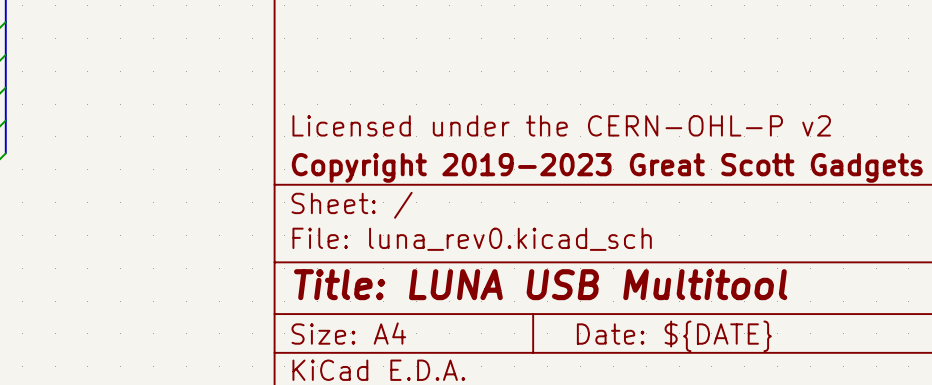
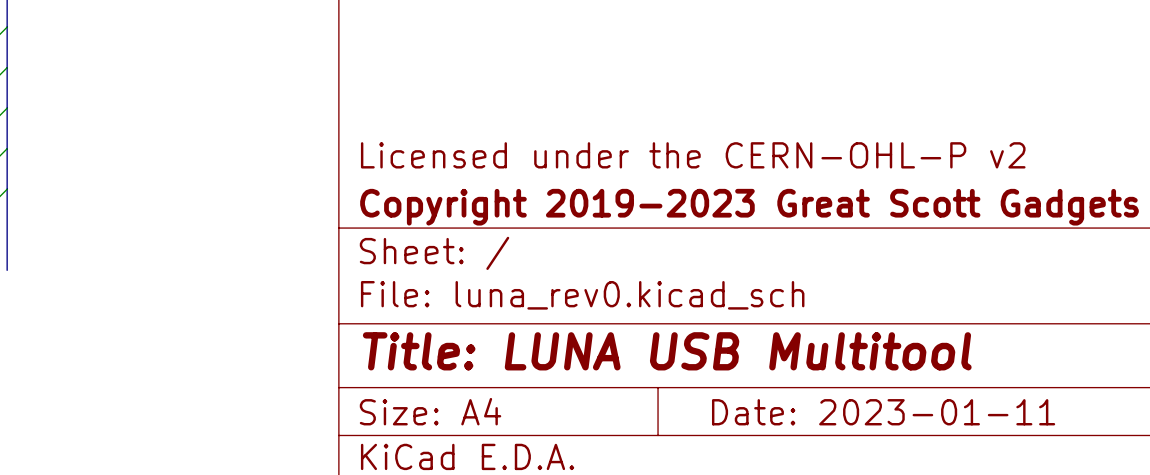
bus: none -> (7, 189) (7, 270)
title block: Date: ${DATE} (674, 336) -> Date: 2023-01-11 (883, 412)

